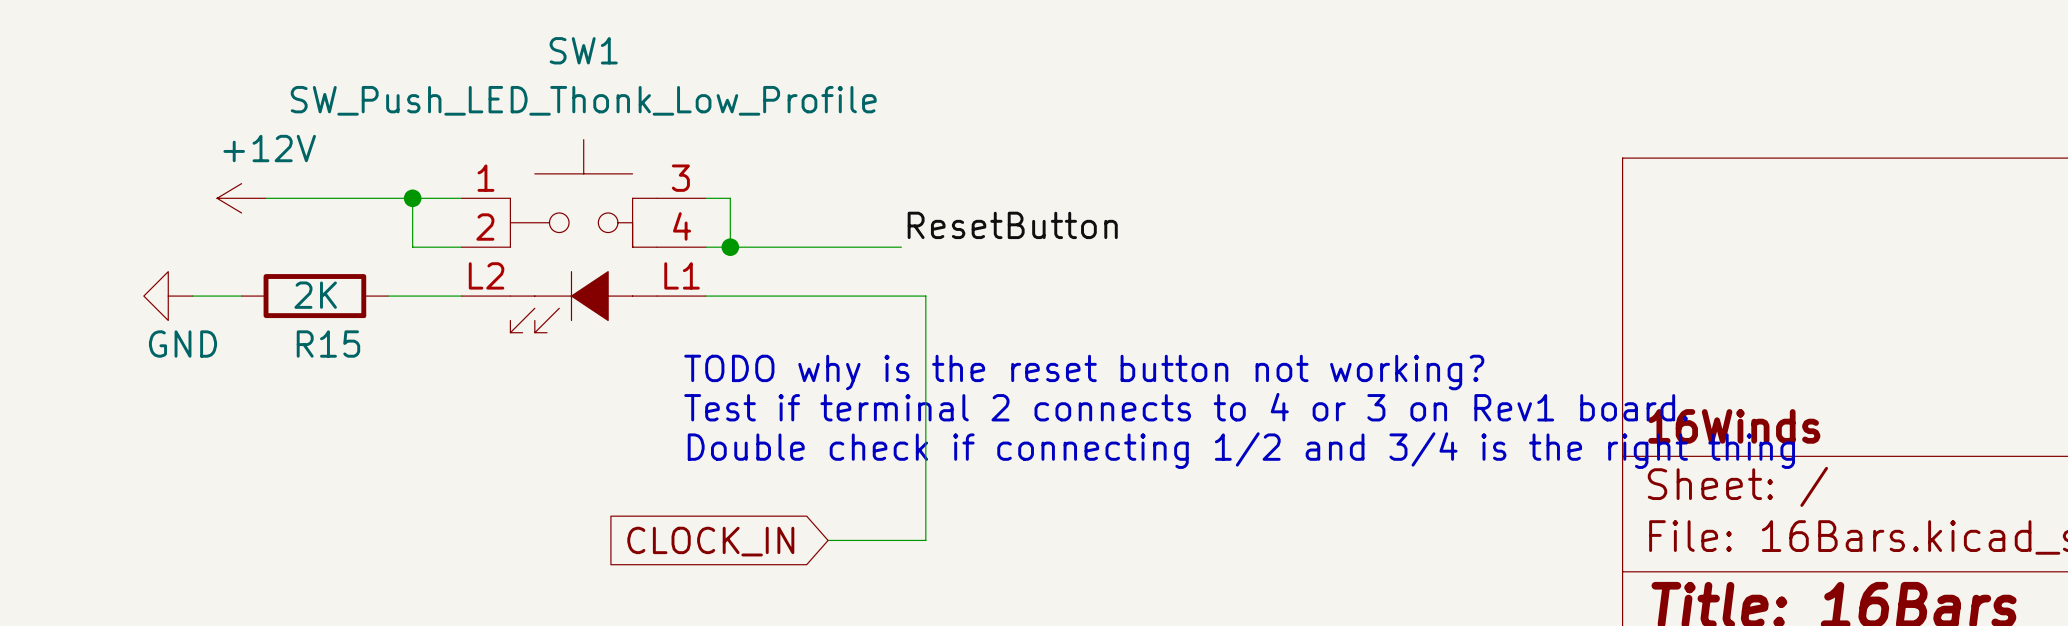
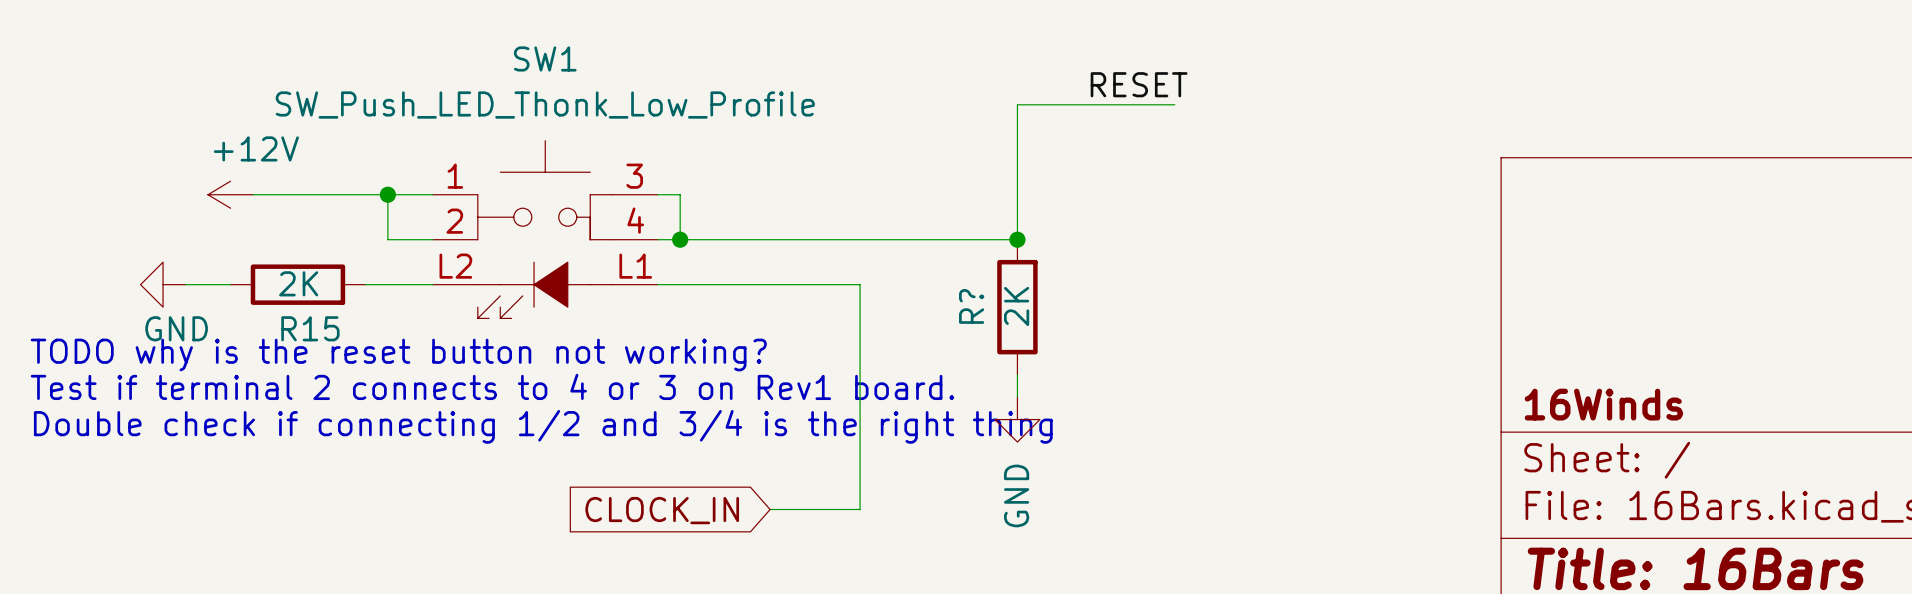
label: none -> RESET (1139, 84)
wire: none -> (1174, 104) (1017, 104) (1017, 239) (837, 239)
label: ResetButton (1012, 225) -> none
junction: none -> (1017, 239)
R?: none -> 2K (1017, 307)
text: none -> TODO why is the reset button not working? (398, 354)
text: TODO why is the reset button not working? (1084, 372) -> none
wire: none -> (1017, 374) (1017, 397)
text: none -> Test if terminal 2 connects to 4 or 3 on Rev1 board. (492, 386)
text: Test if terminal 2 connects to 4 or 3 on Rev1 board. (1186, 407) -> none
power symbol: none -> GND (1017, 419)
text: none -> Double check if connecting 1/2 and 3/4 is the right thing (543, 426)
text: Double check if connecting 1/2 and 3/4 is the right thing (1241, 450) -> none

